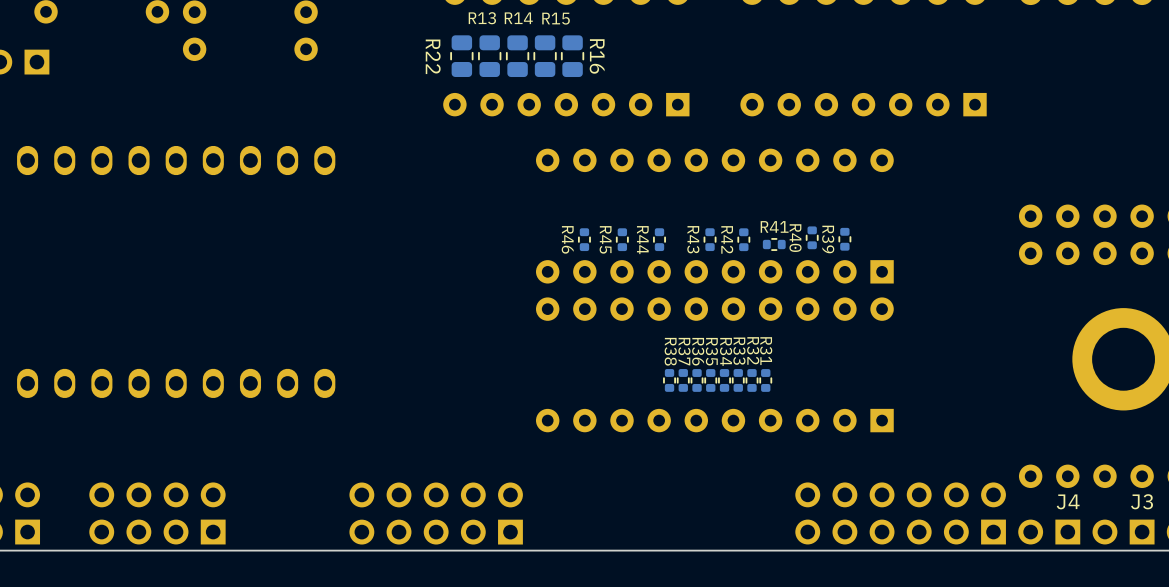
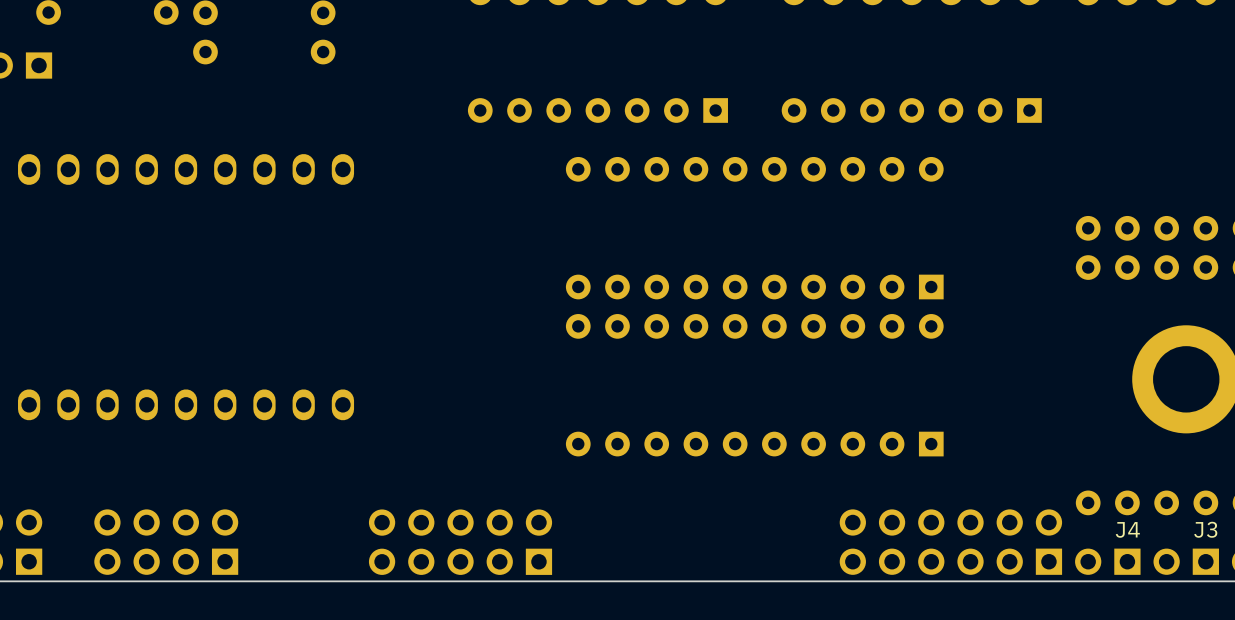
R22: (461, 56) -> none
R13: (489, 56) -> none
R14: (517, 56) -> none
R15: (545, 56) -> none
R16: (572, 56) -> none
R40: (812, 237) -> none
R46: (584, 239) -> none
R45: (622, 239) -> none
R44: (659, 239) -> none
R43: (710, 239) -> none
R42: (743, 239) -> none
R39: (844, 239) -> none
R41: (774, 244) -> none
R38: (669, 380) -> none
R37: (683, 380) -> none
R36: (697, 380) -> none
R35: (710, 380) -> none
R34: (724, 380) -> none
R33: (738, 380) -> none
R32: (752, 380) -> none
R31: (765, 380) -> none

